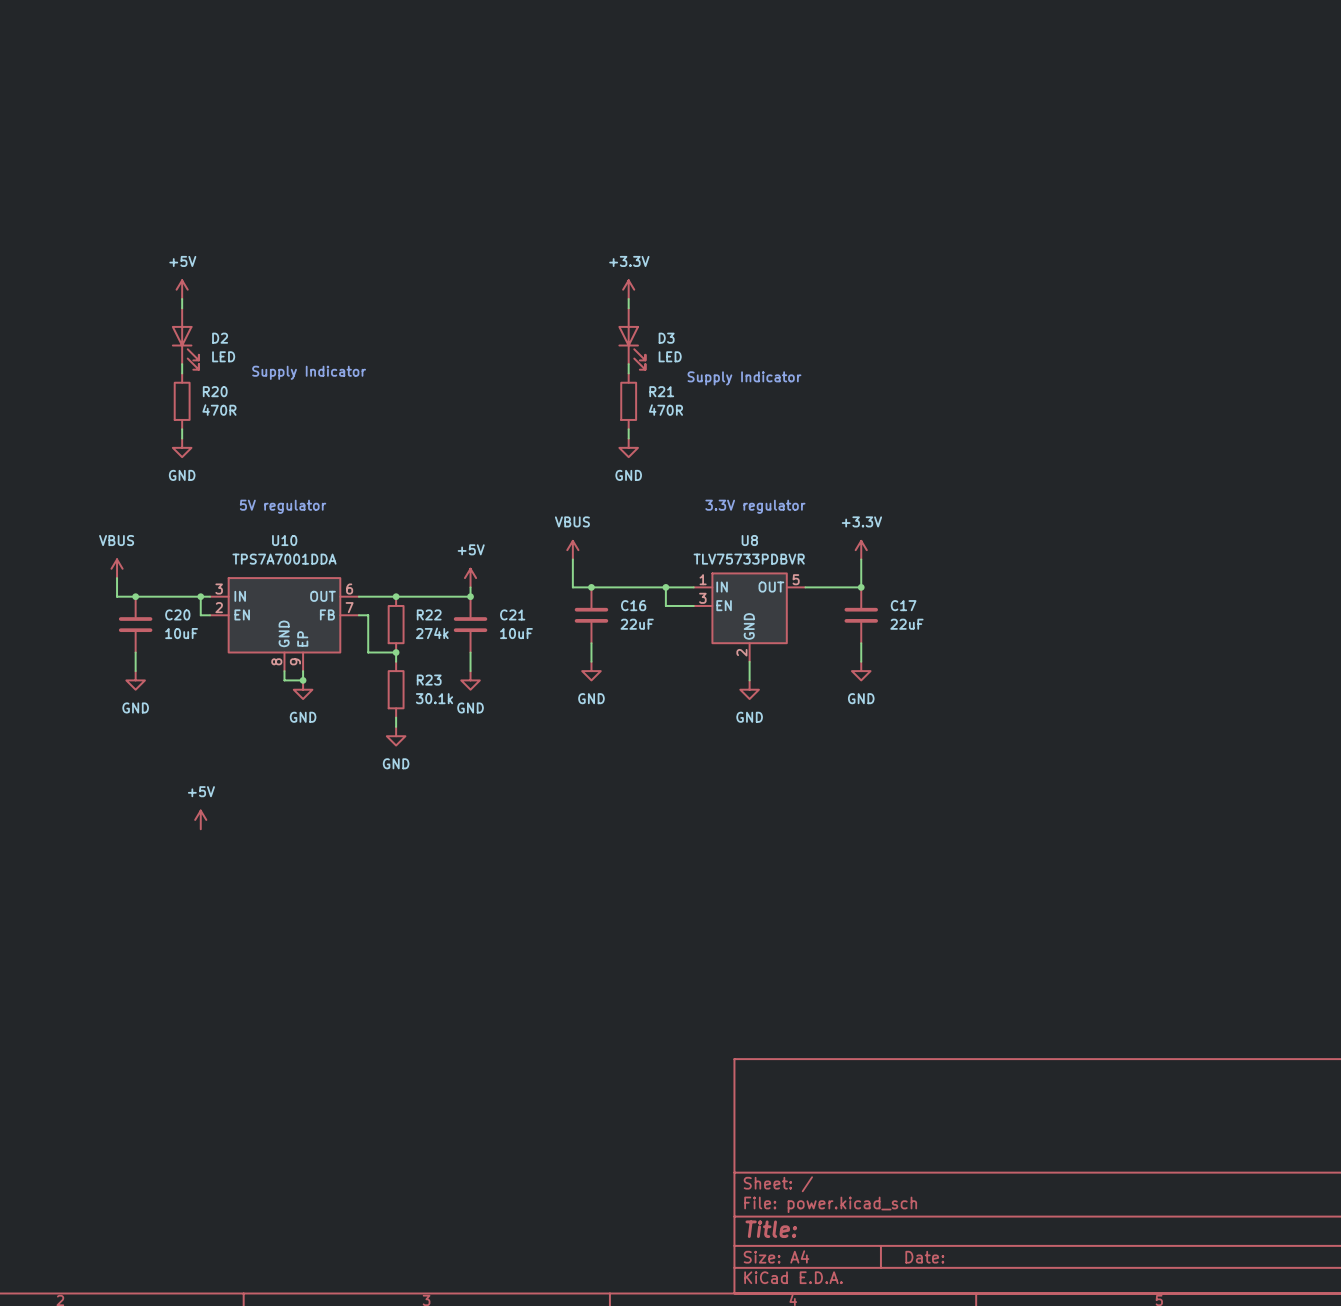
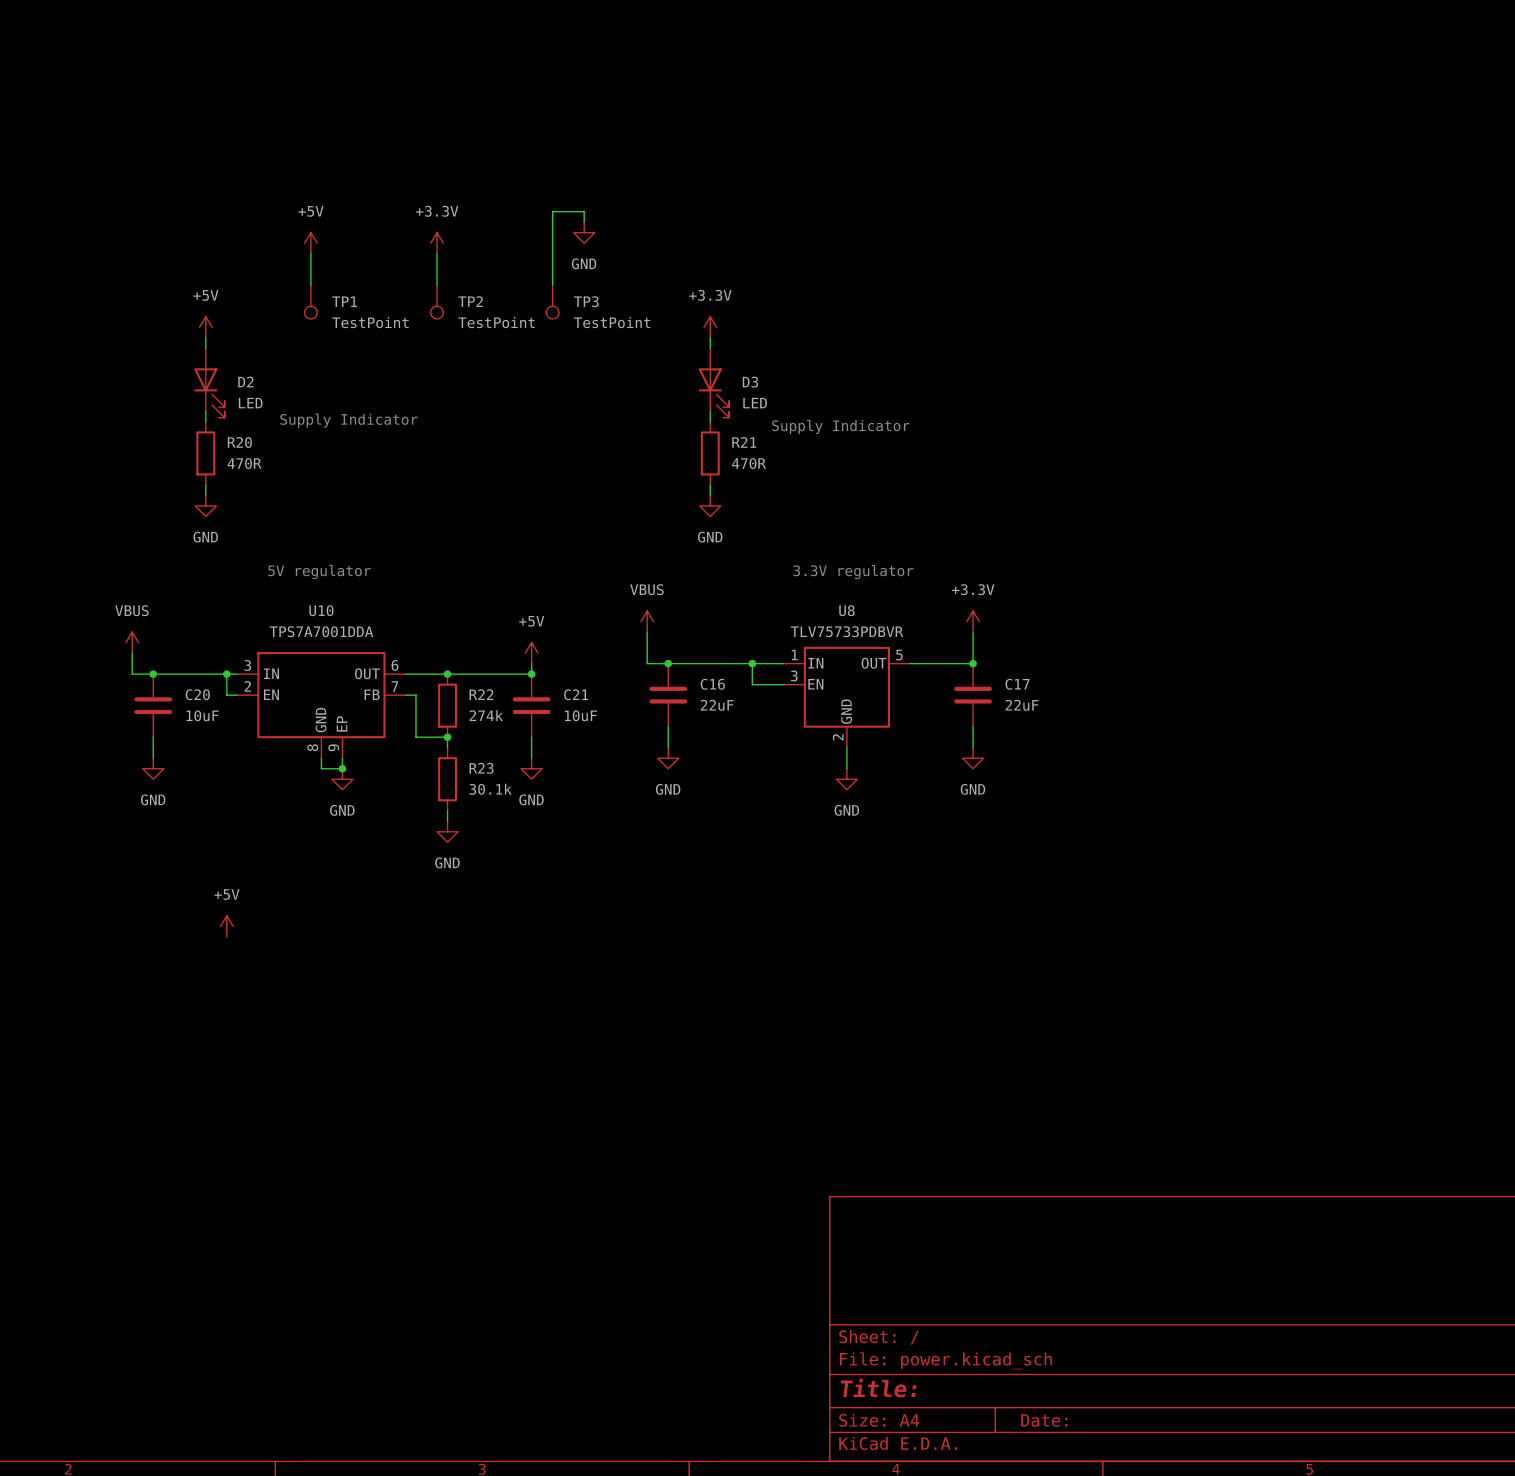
wire: none -> (584, 222) (584, 211) (552, 211) (552, 285)
power symbol: none -> GND (584, 232)
power symbol: none -> +5V (310, 243)
power symbol: none -> +3.3V (437, 243)
wire: none -> (310, 253) (310, 285)
wire: none -> (437, 253) (437, 285)
TP1: none -> TestPoint (310, 302)
TP2: none -> TestPoint (437, 302)
TP3: none -> TestPoint (552, 302)

